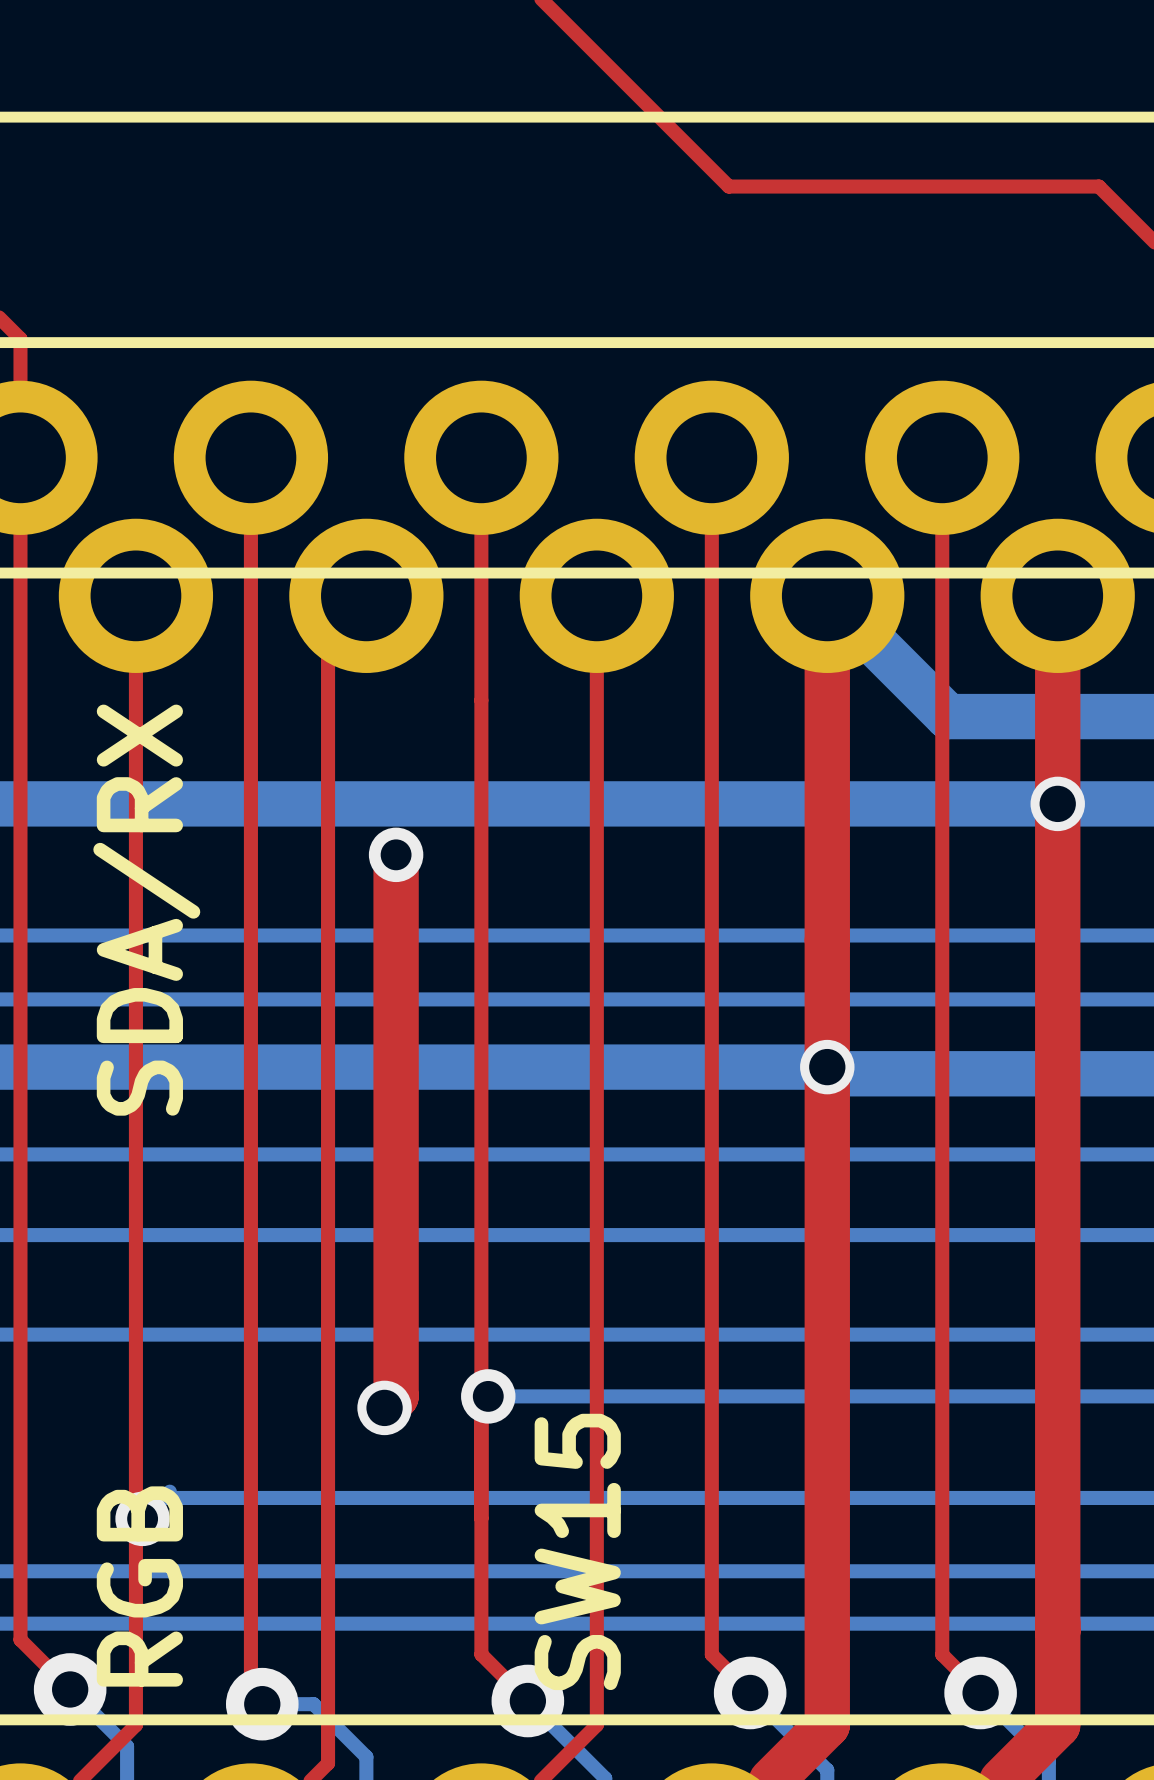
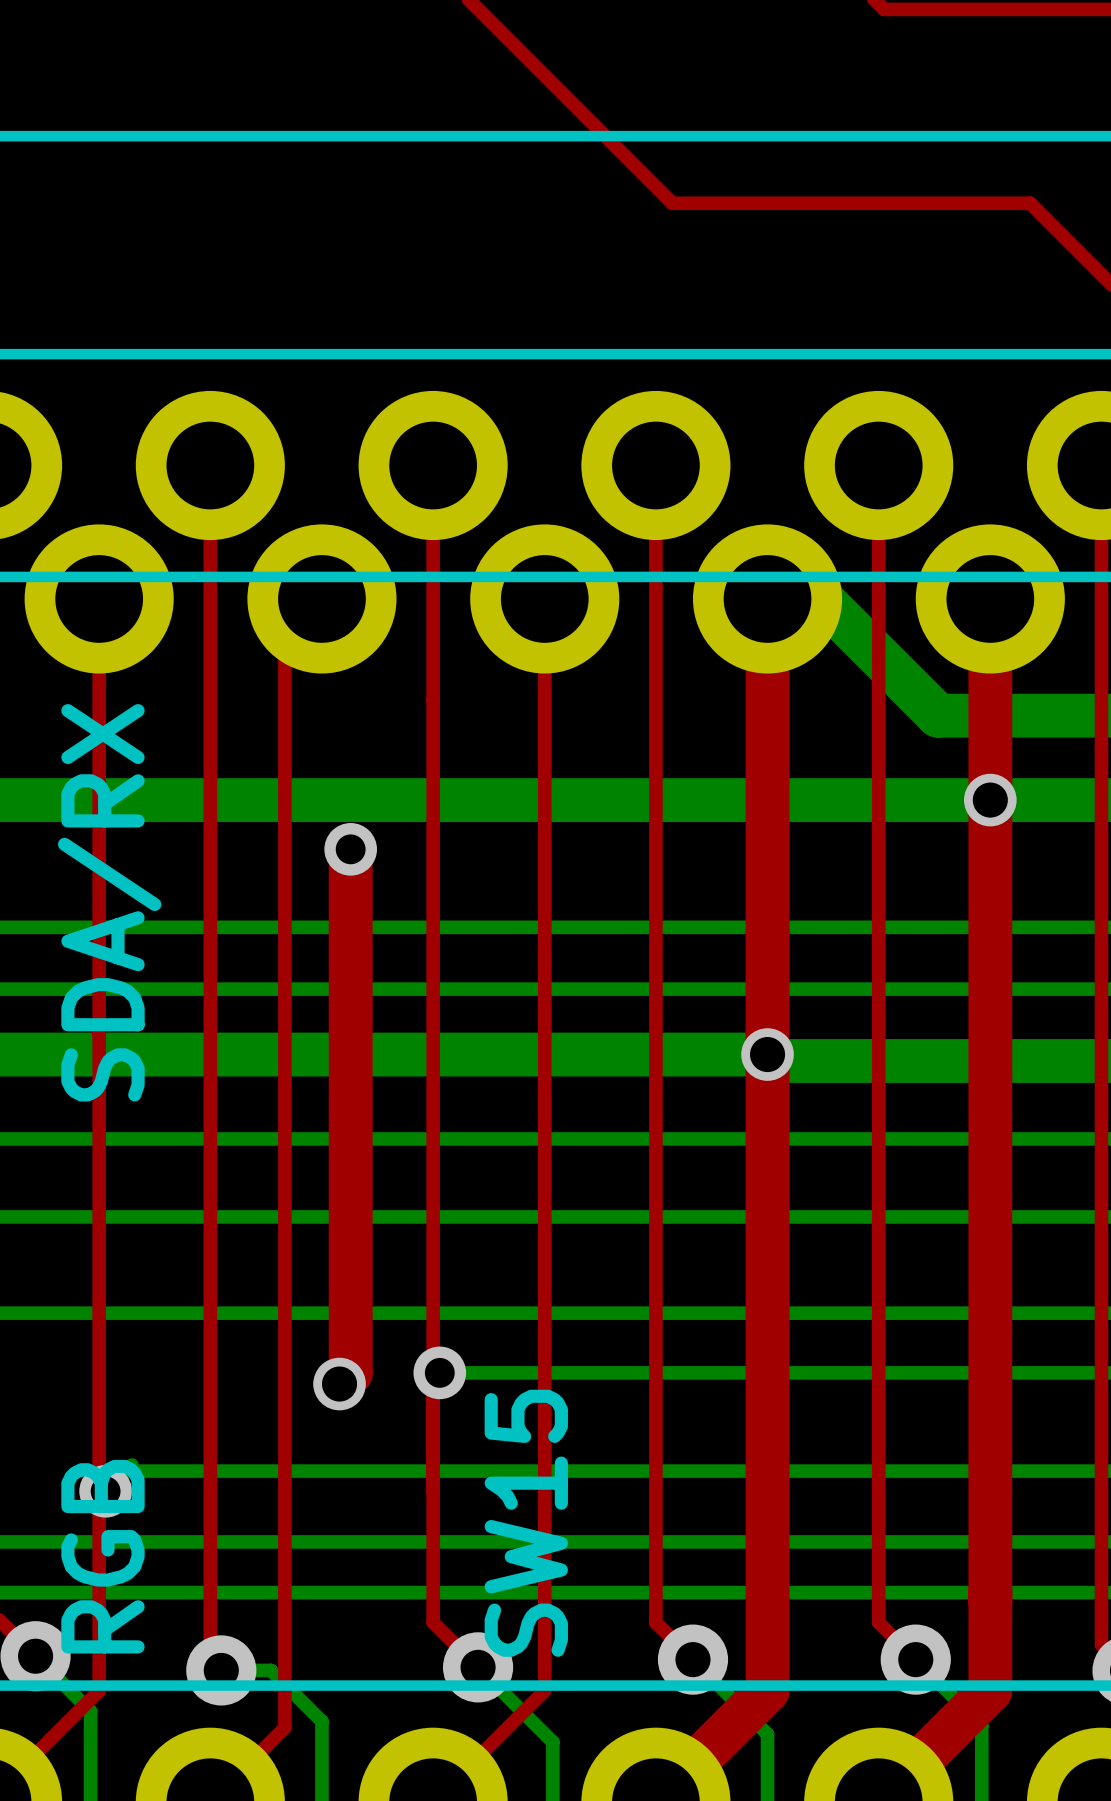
bottom track: (827, 595) (948, 716) (1003, 716) -> (767, 598) (821, 598) (938, 715)

